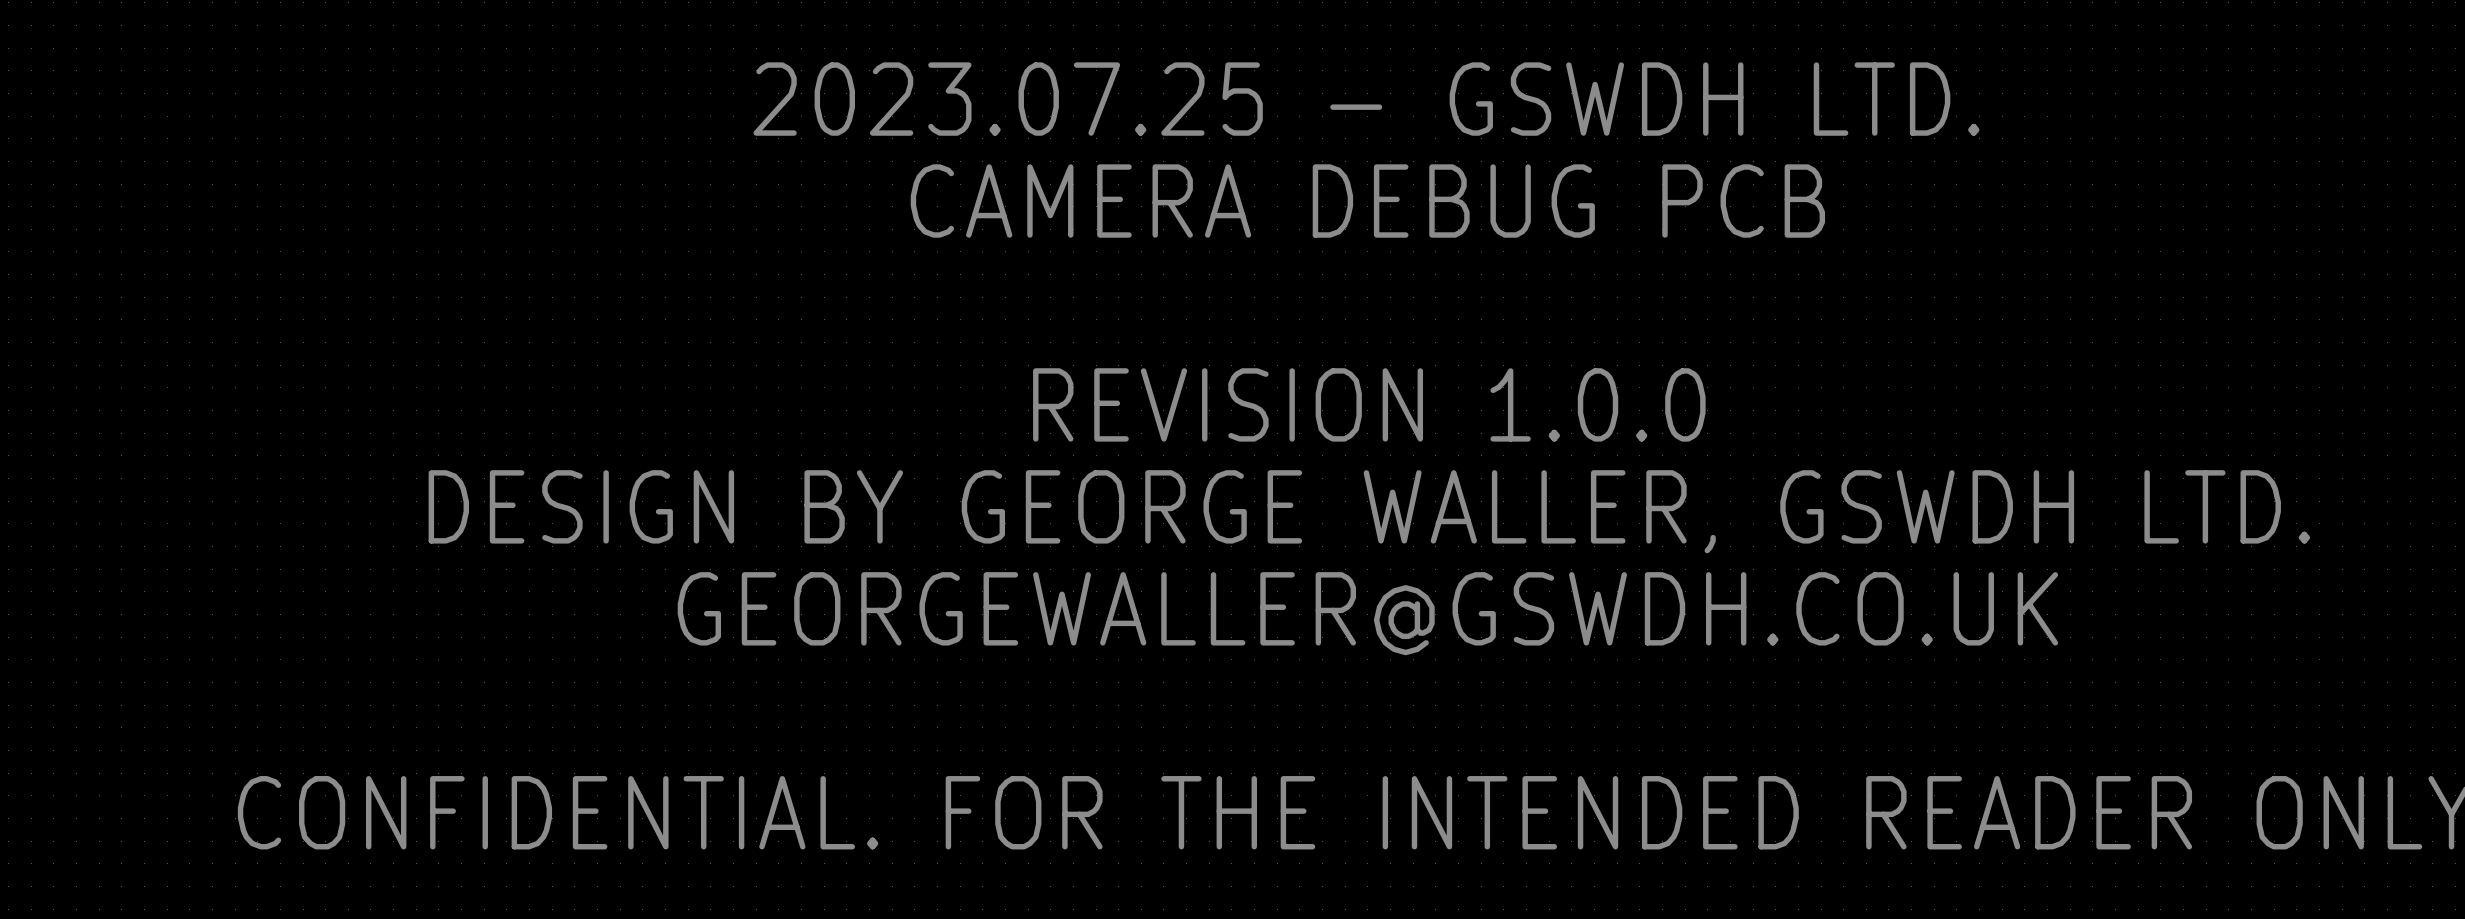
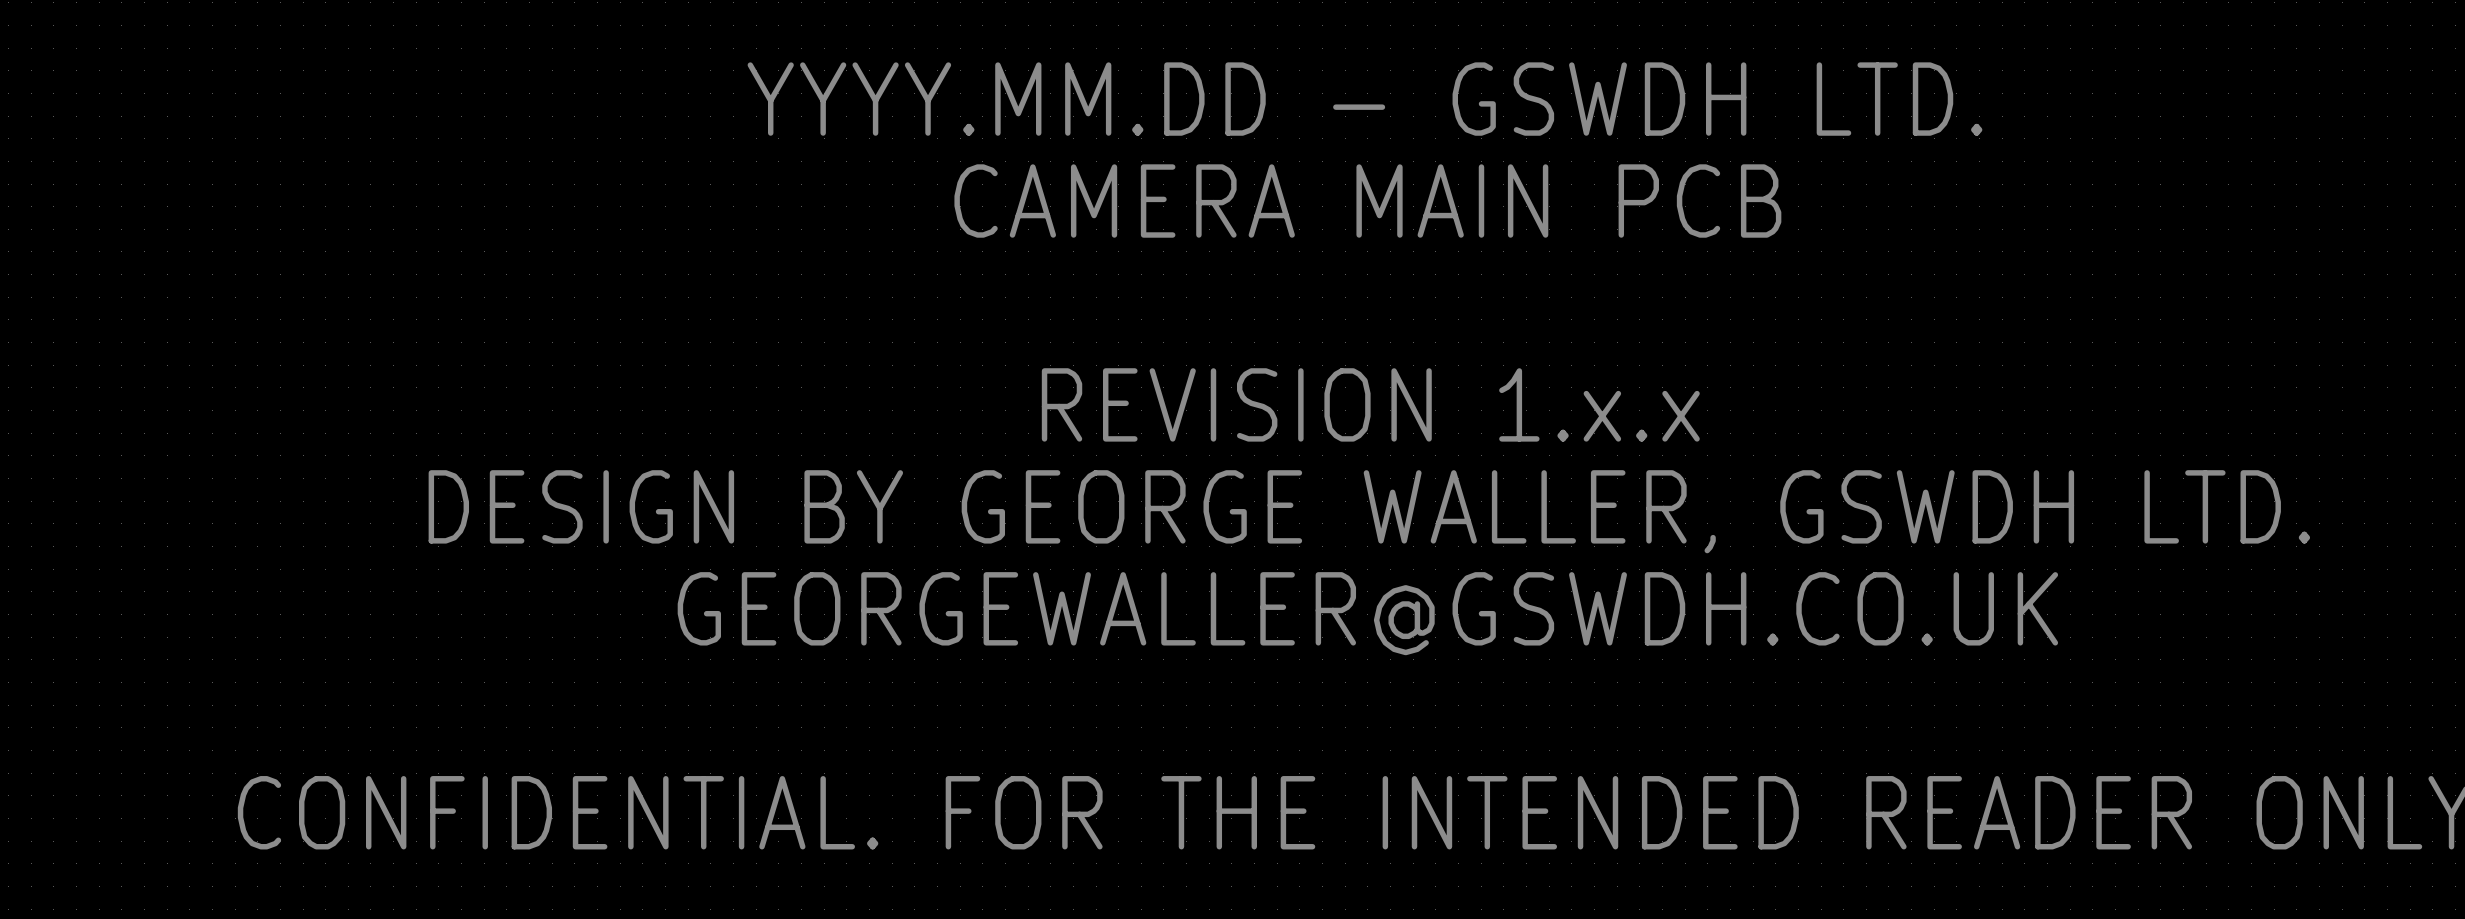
text: 2023.07.25 - GSWDH LTD. (1366, 99) -> YYYY.MM.DD - GSWDH LTD. (1364, 99)
text: CAMERA DEBUG PCB (1367, 201) -> CAMERA MAIN PCB (1367, 201)
text: REVISION 1.0.0 (1369, 404) -> REVISION 1.x.x (1370, 404)

